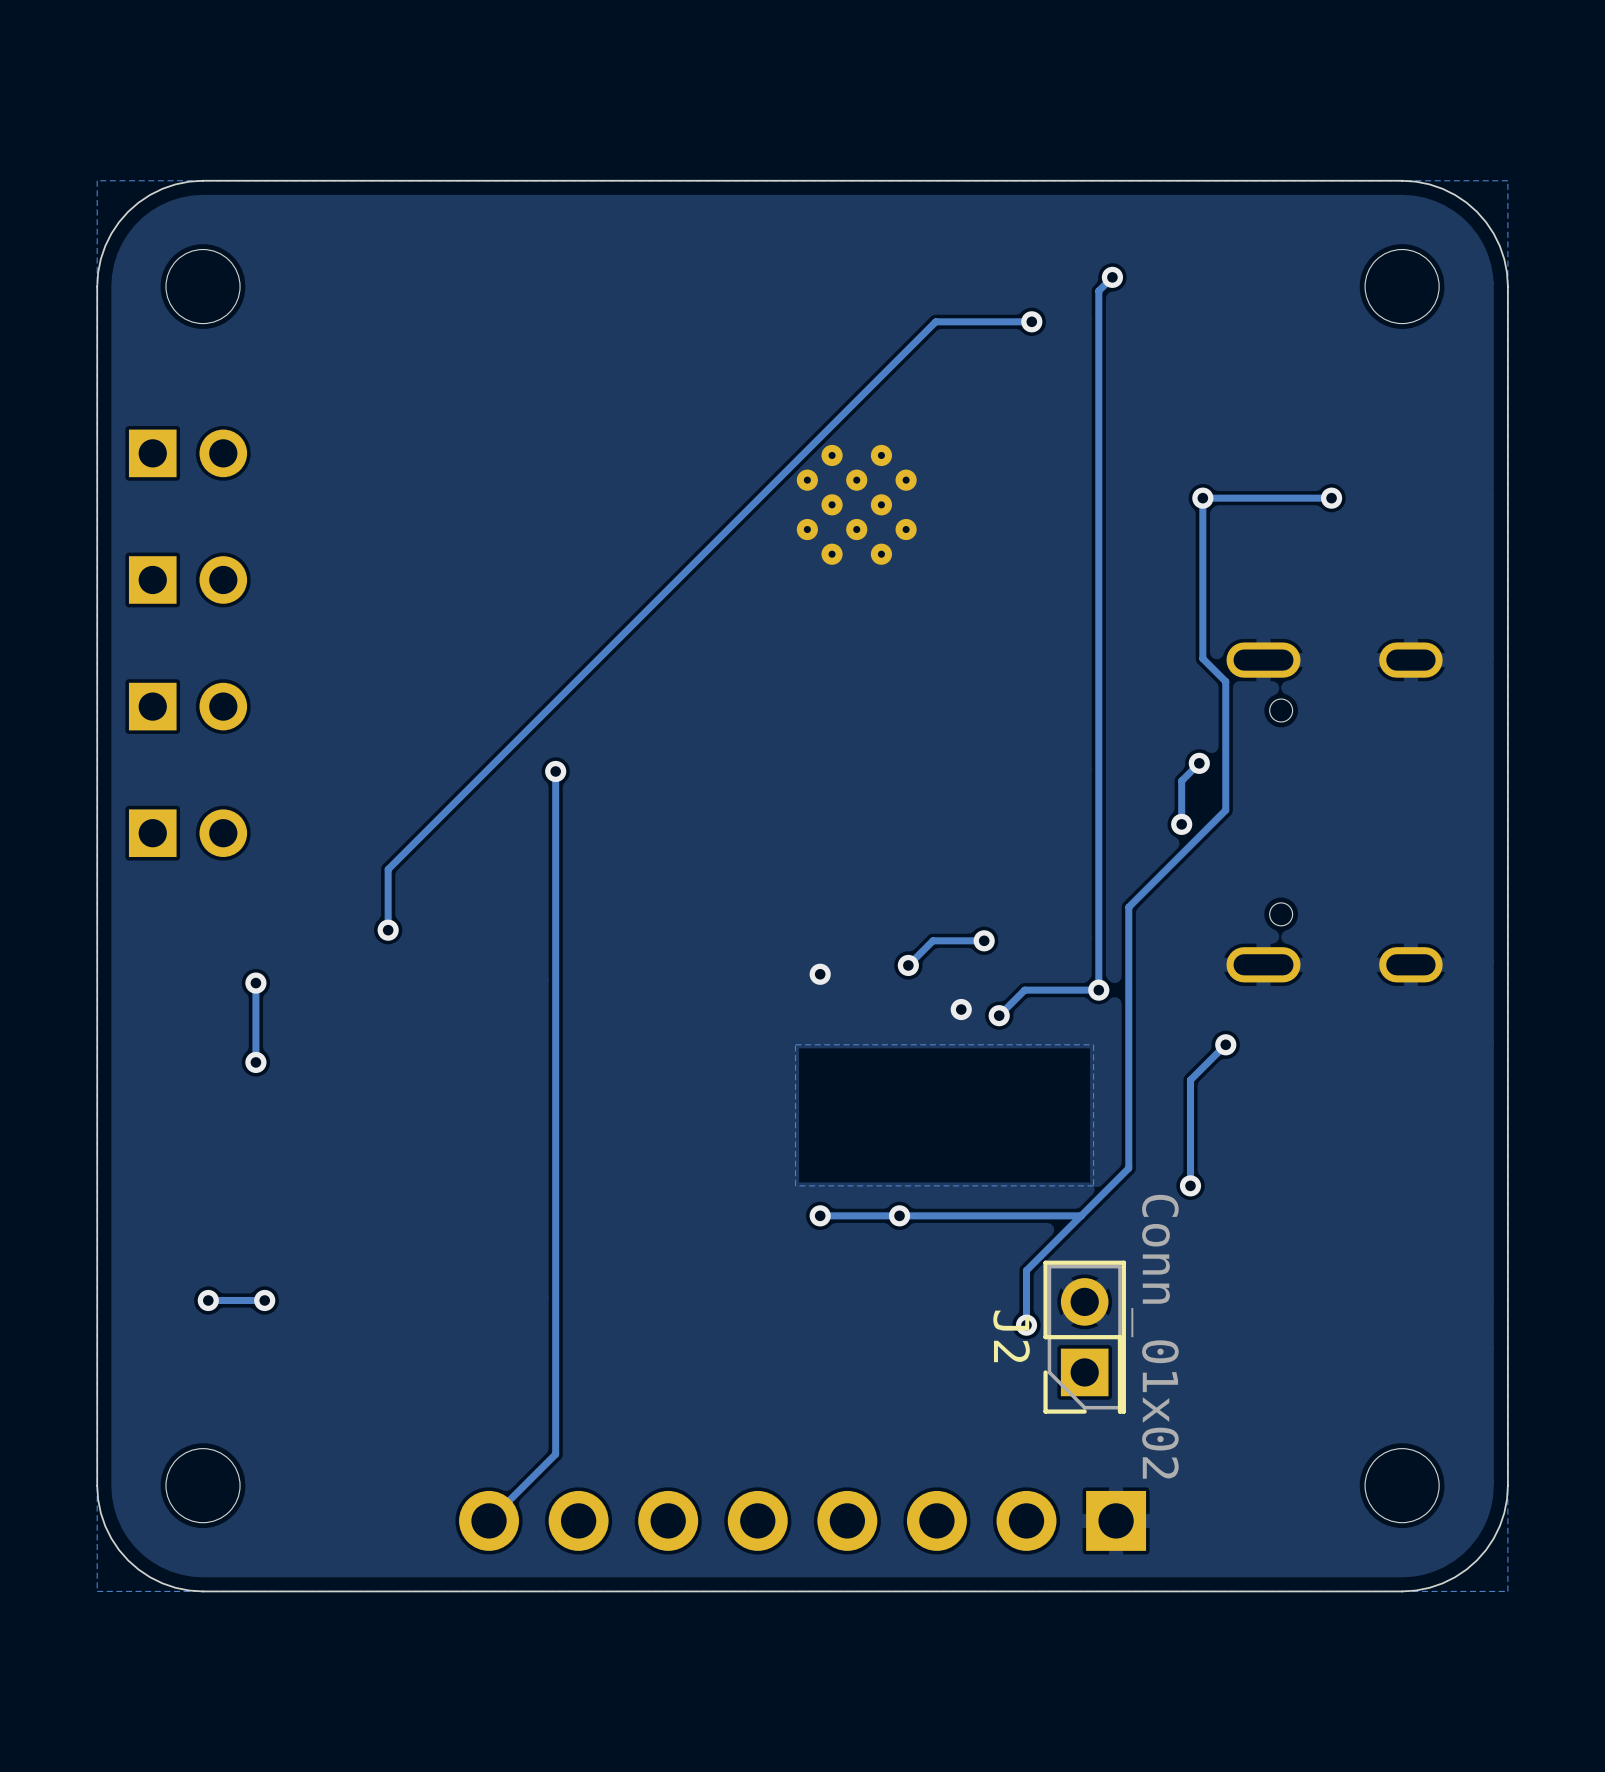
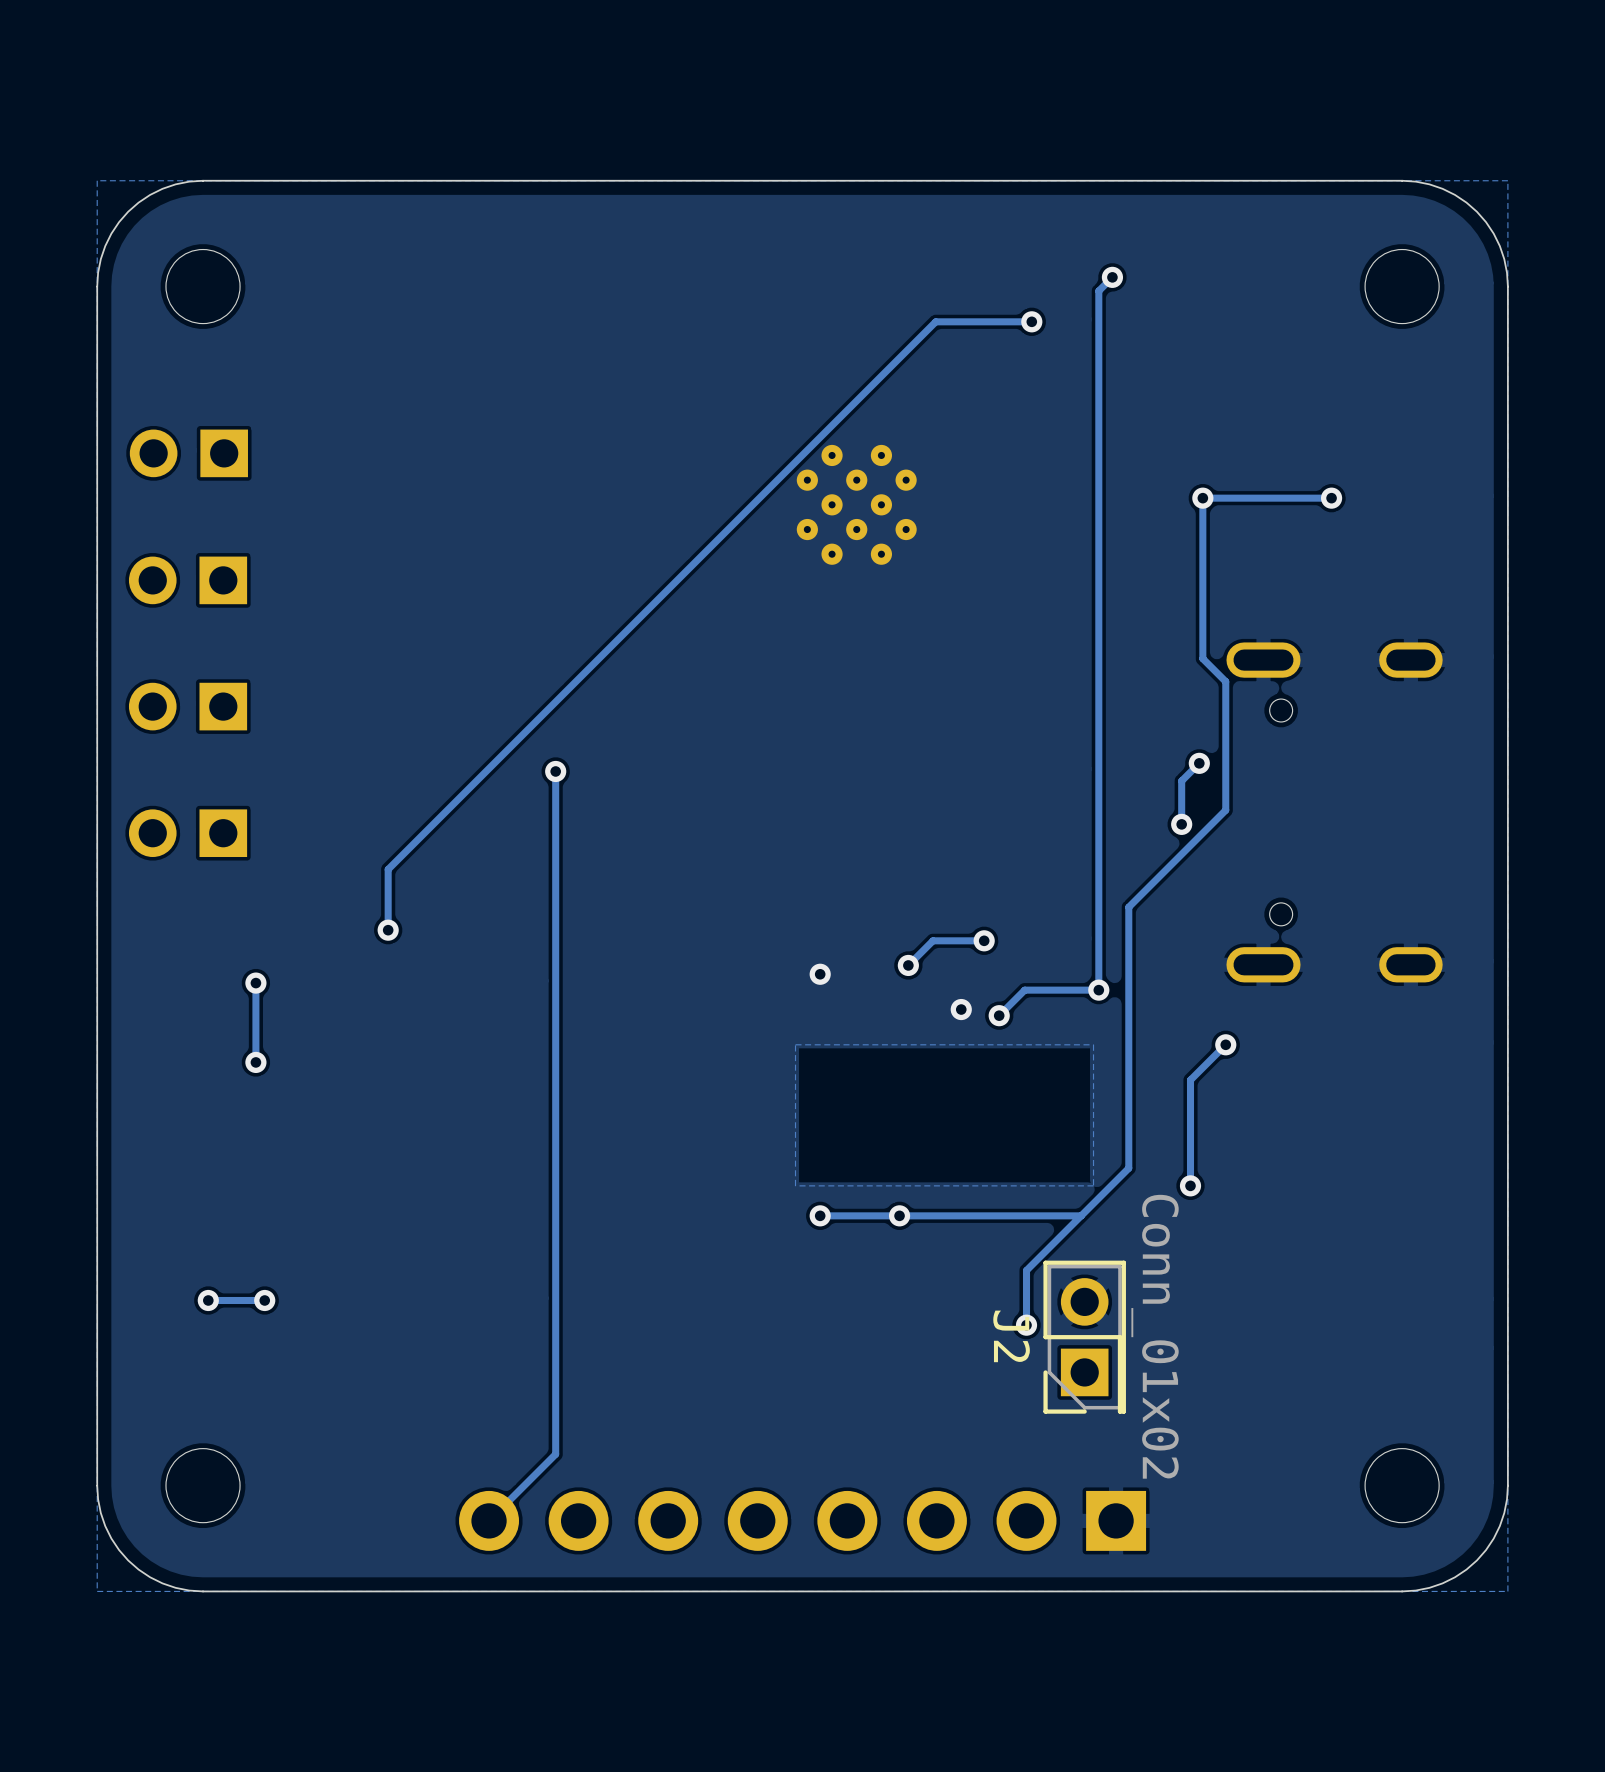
part rotation: 0° (188, 453) -> 180° (188, 453)
part rotation: 0° (188, 579) -> 180° (188, 580)
part rotation: 0° (188, 706) -> 180° (188, 706)
part rotation: 0° (188, 833) -> 180° (188, 833)

